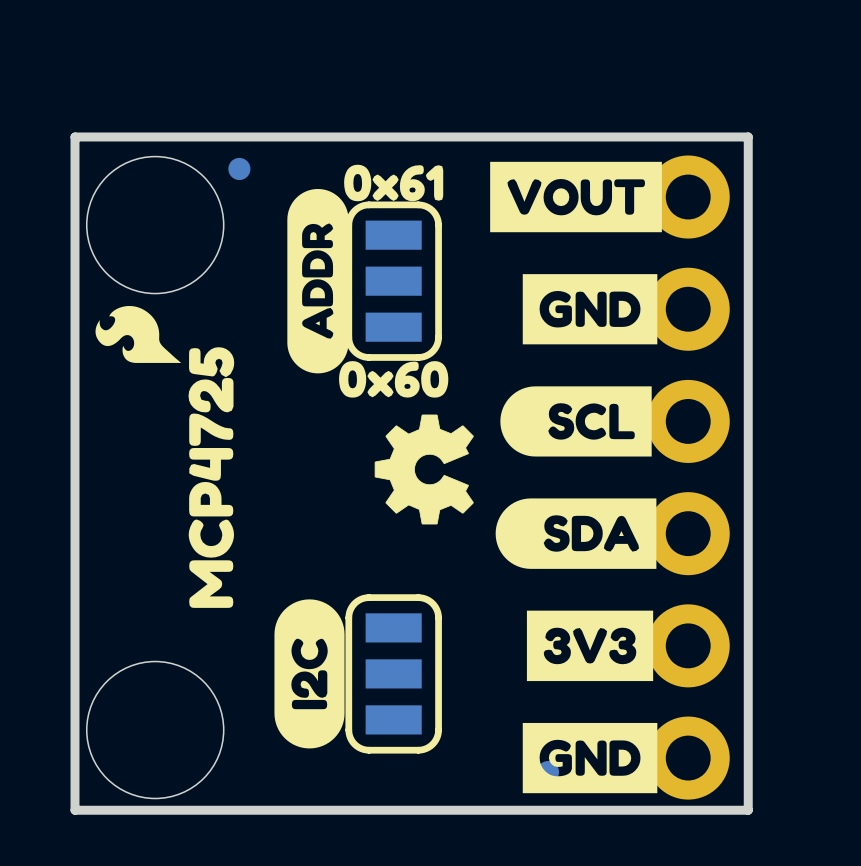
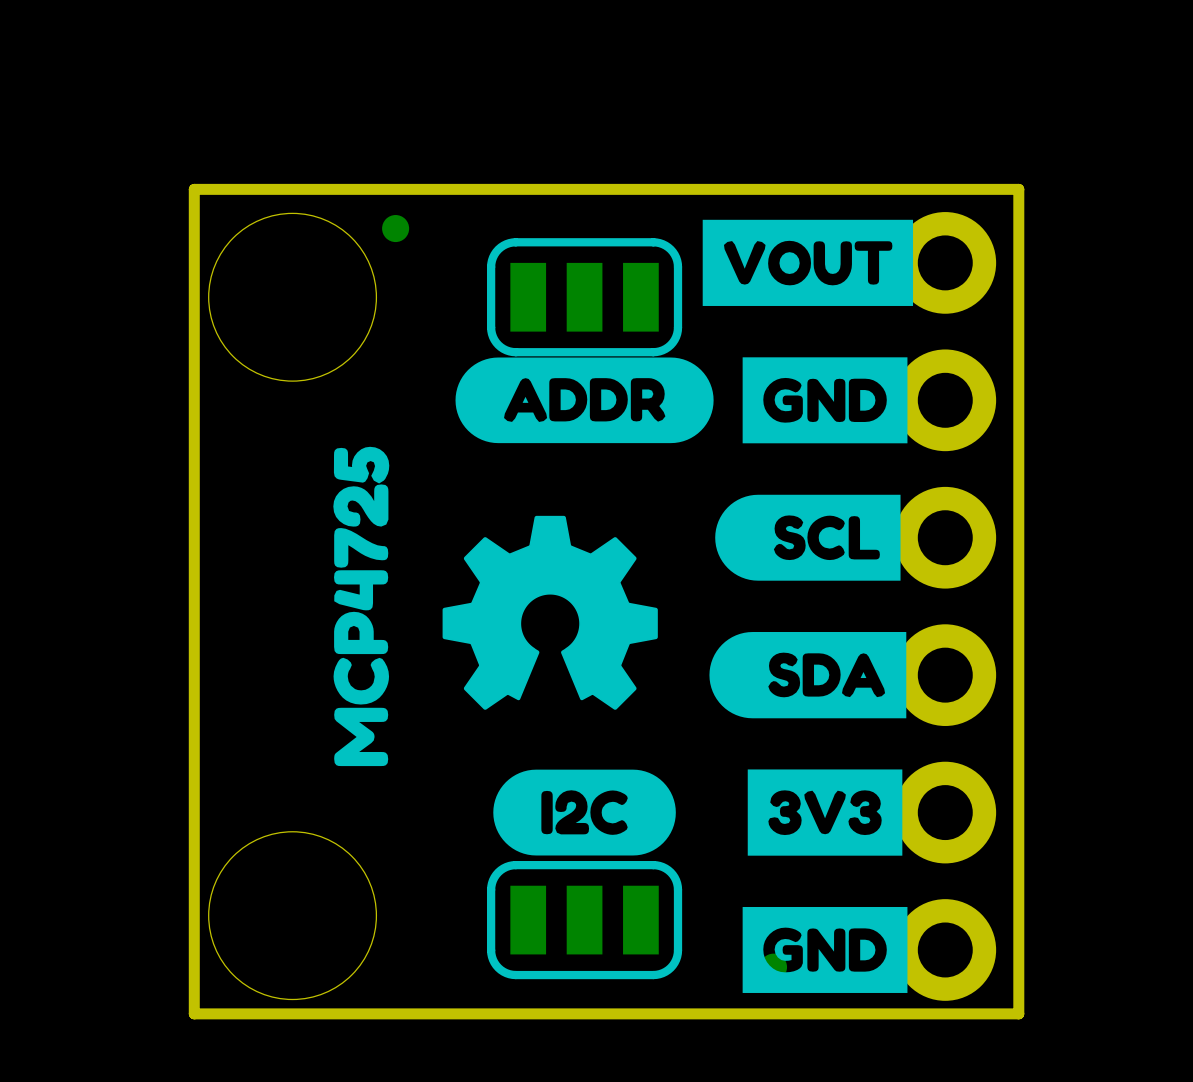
drawing: [287, 164, 474, 525] -> none
drawing: none -> [455, 357, 714, 444]
part rotation: 0° (393, 281) -> 90° clockwise (584, 297)
drawing: [95, 305, 182, 363] -> none
drawing: none -> [442, 515, 676, 856]
drawing: [274, 599, 345, 749] -> none
part rotation: 0° (393, 673) -> 90° clockwise (584, 920)

